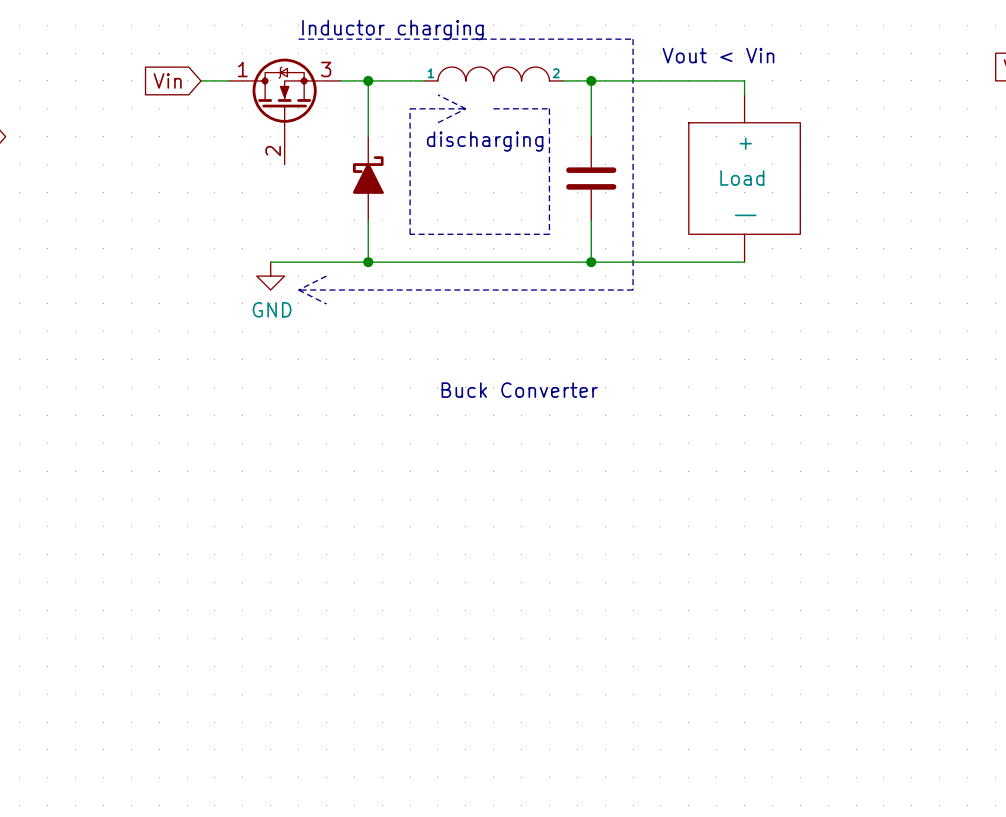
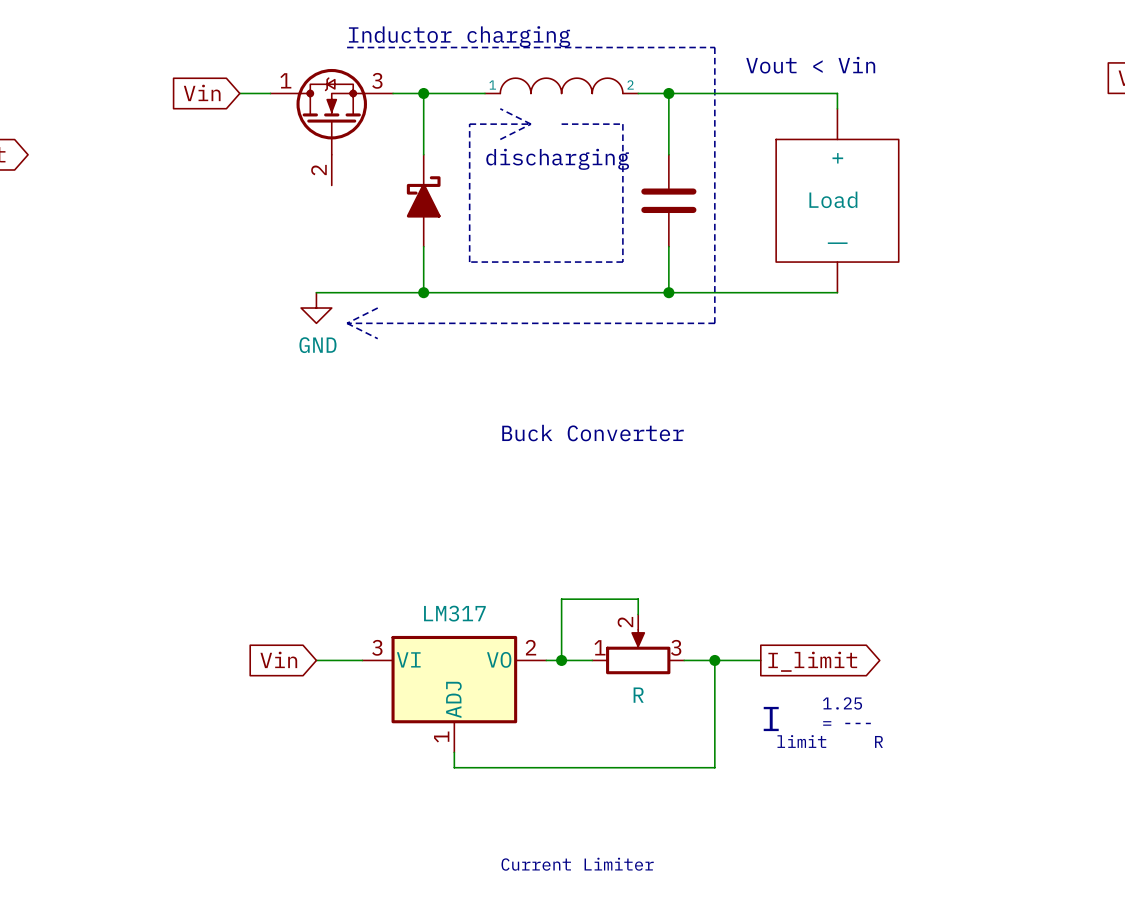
wire: none -> (638, 614) (638, 599) (561, 599) (561, 660)
R: none -> (638, 644)
global label: none -> Vin (278, 659)
wire: none -> (316, 660) (362, 660)
wire: none -> (546, 660) (592, 660)
junction: none -> (561, 660)
wire: none -> (684, 660) (760, 660)
wire: none -> (714, 660) (714, 767) (454, 767) (454, 752)
junction: none -> (714, 660)
global label: none -> I_limit (812, 661)
part: none -> LM317 (454, 694)
text: none -> 1.25 (842, 703)
text: none -> I (771, 718)
text: none -> = --- (847, 723)
text: none -> limit (801, 741)
text: none -> R (878, 741)
text: none -> Current Limiter (577, 864)

